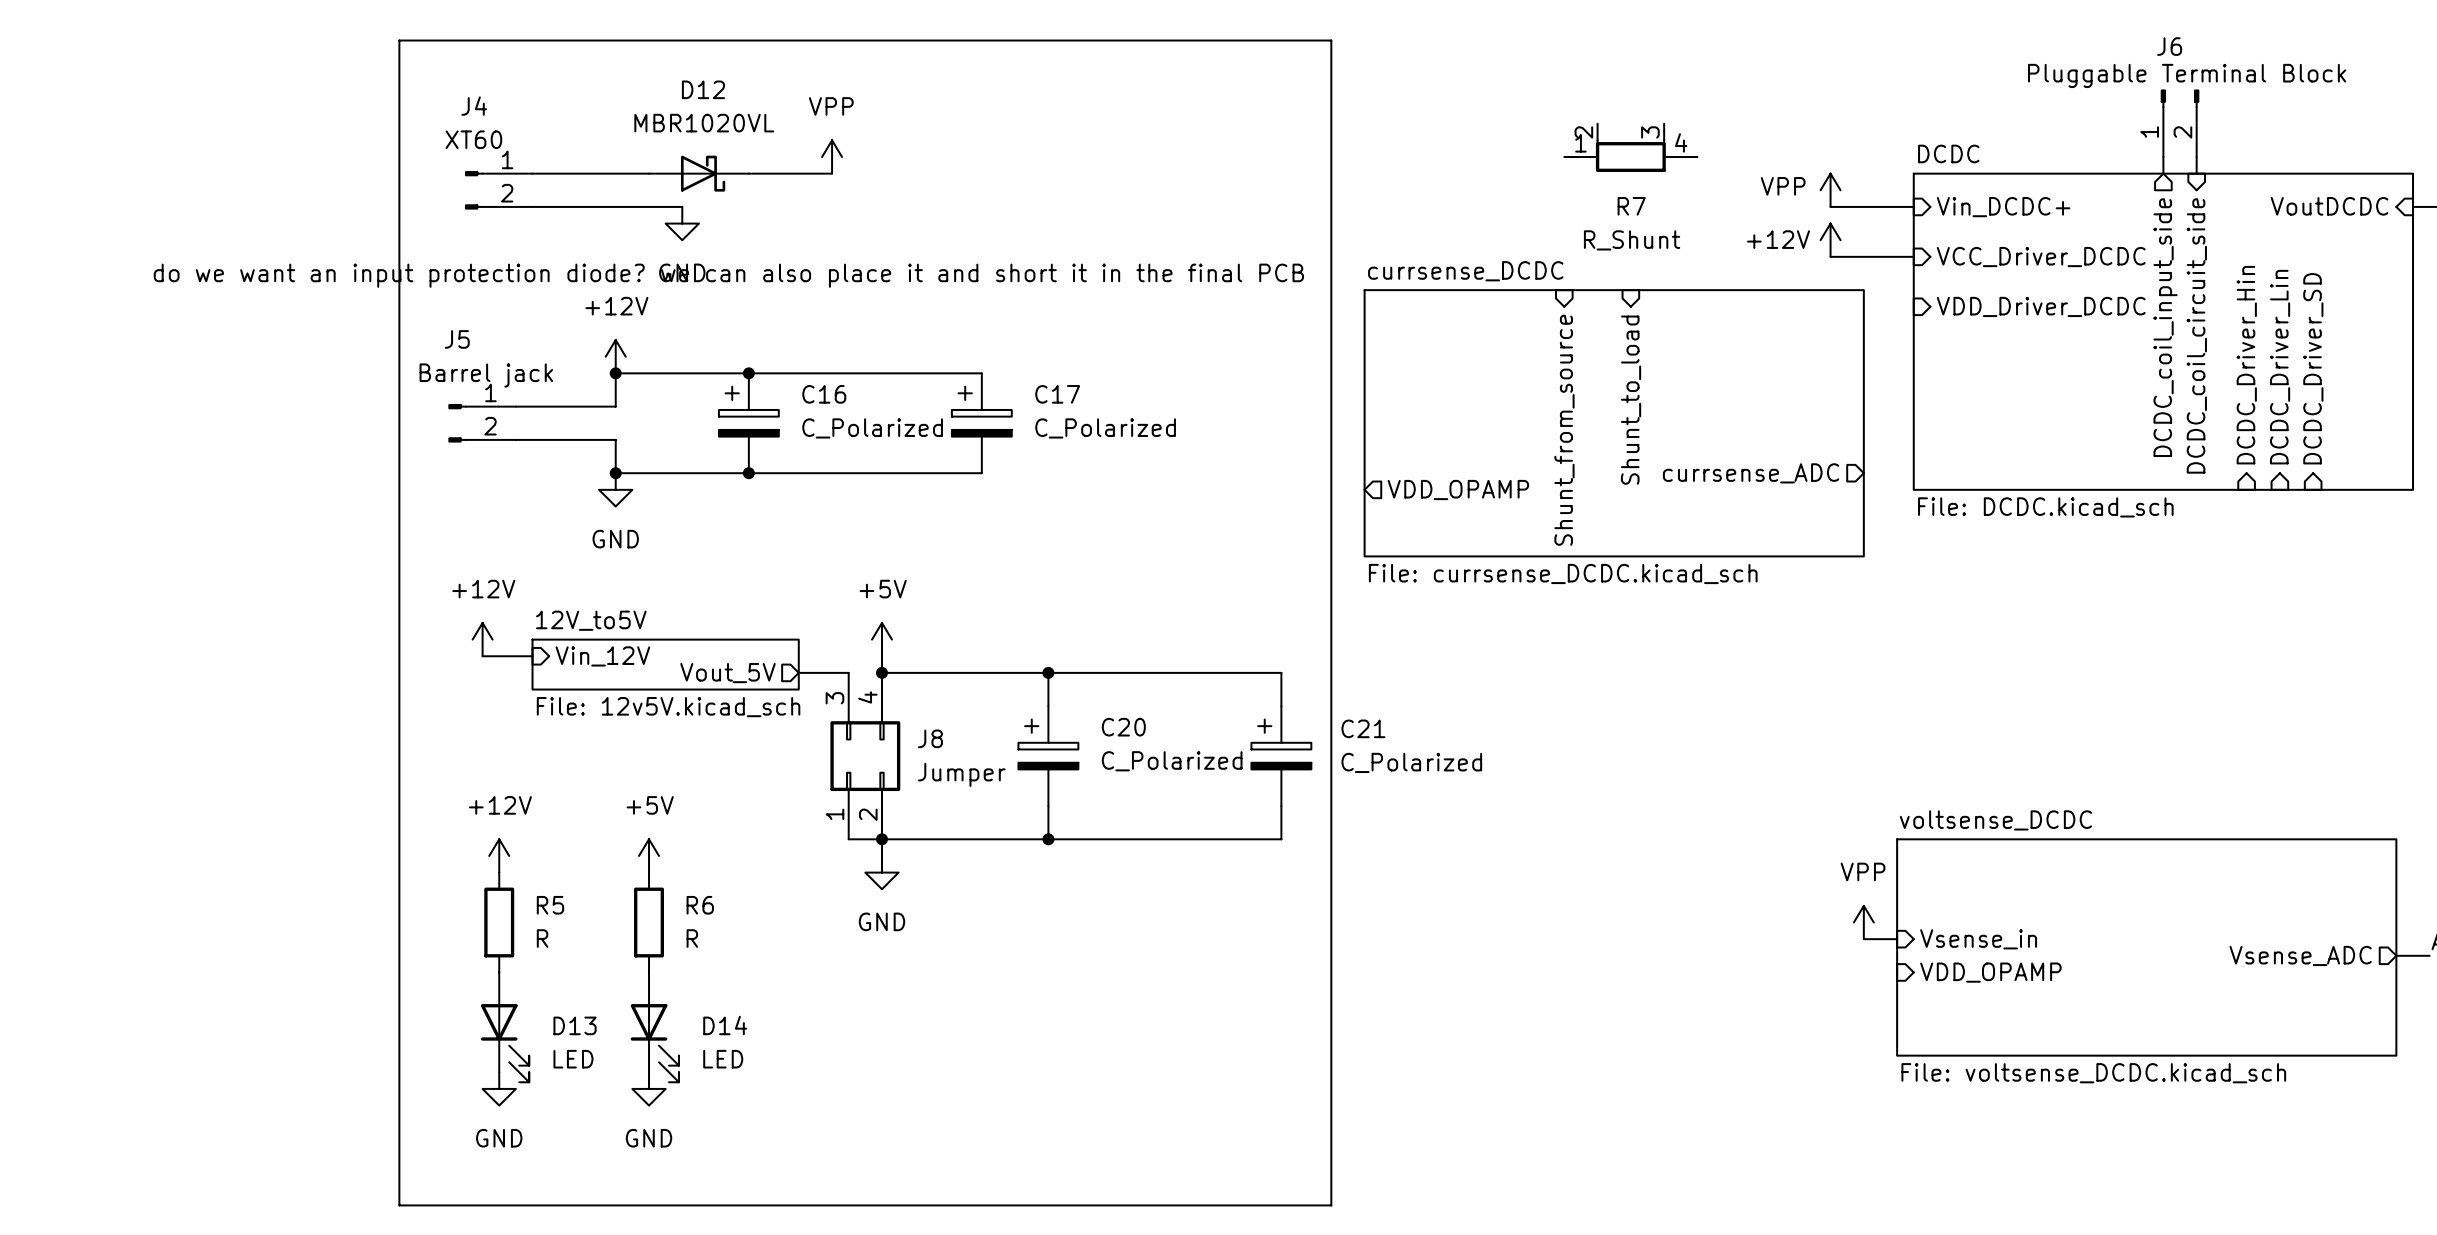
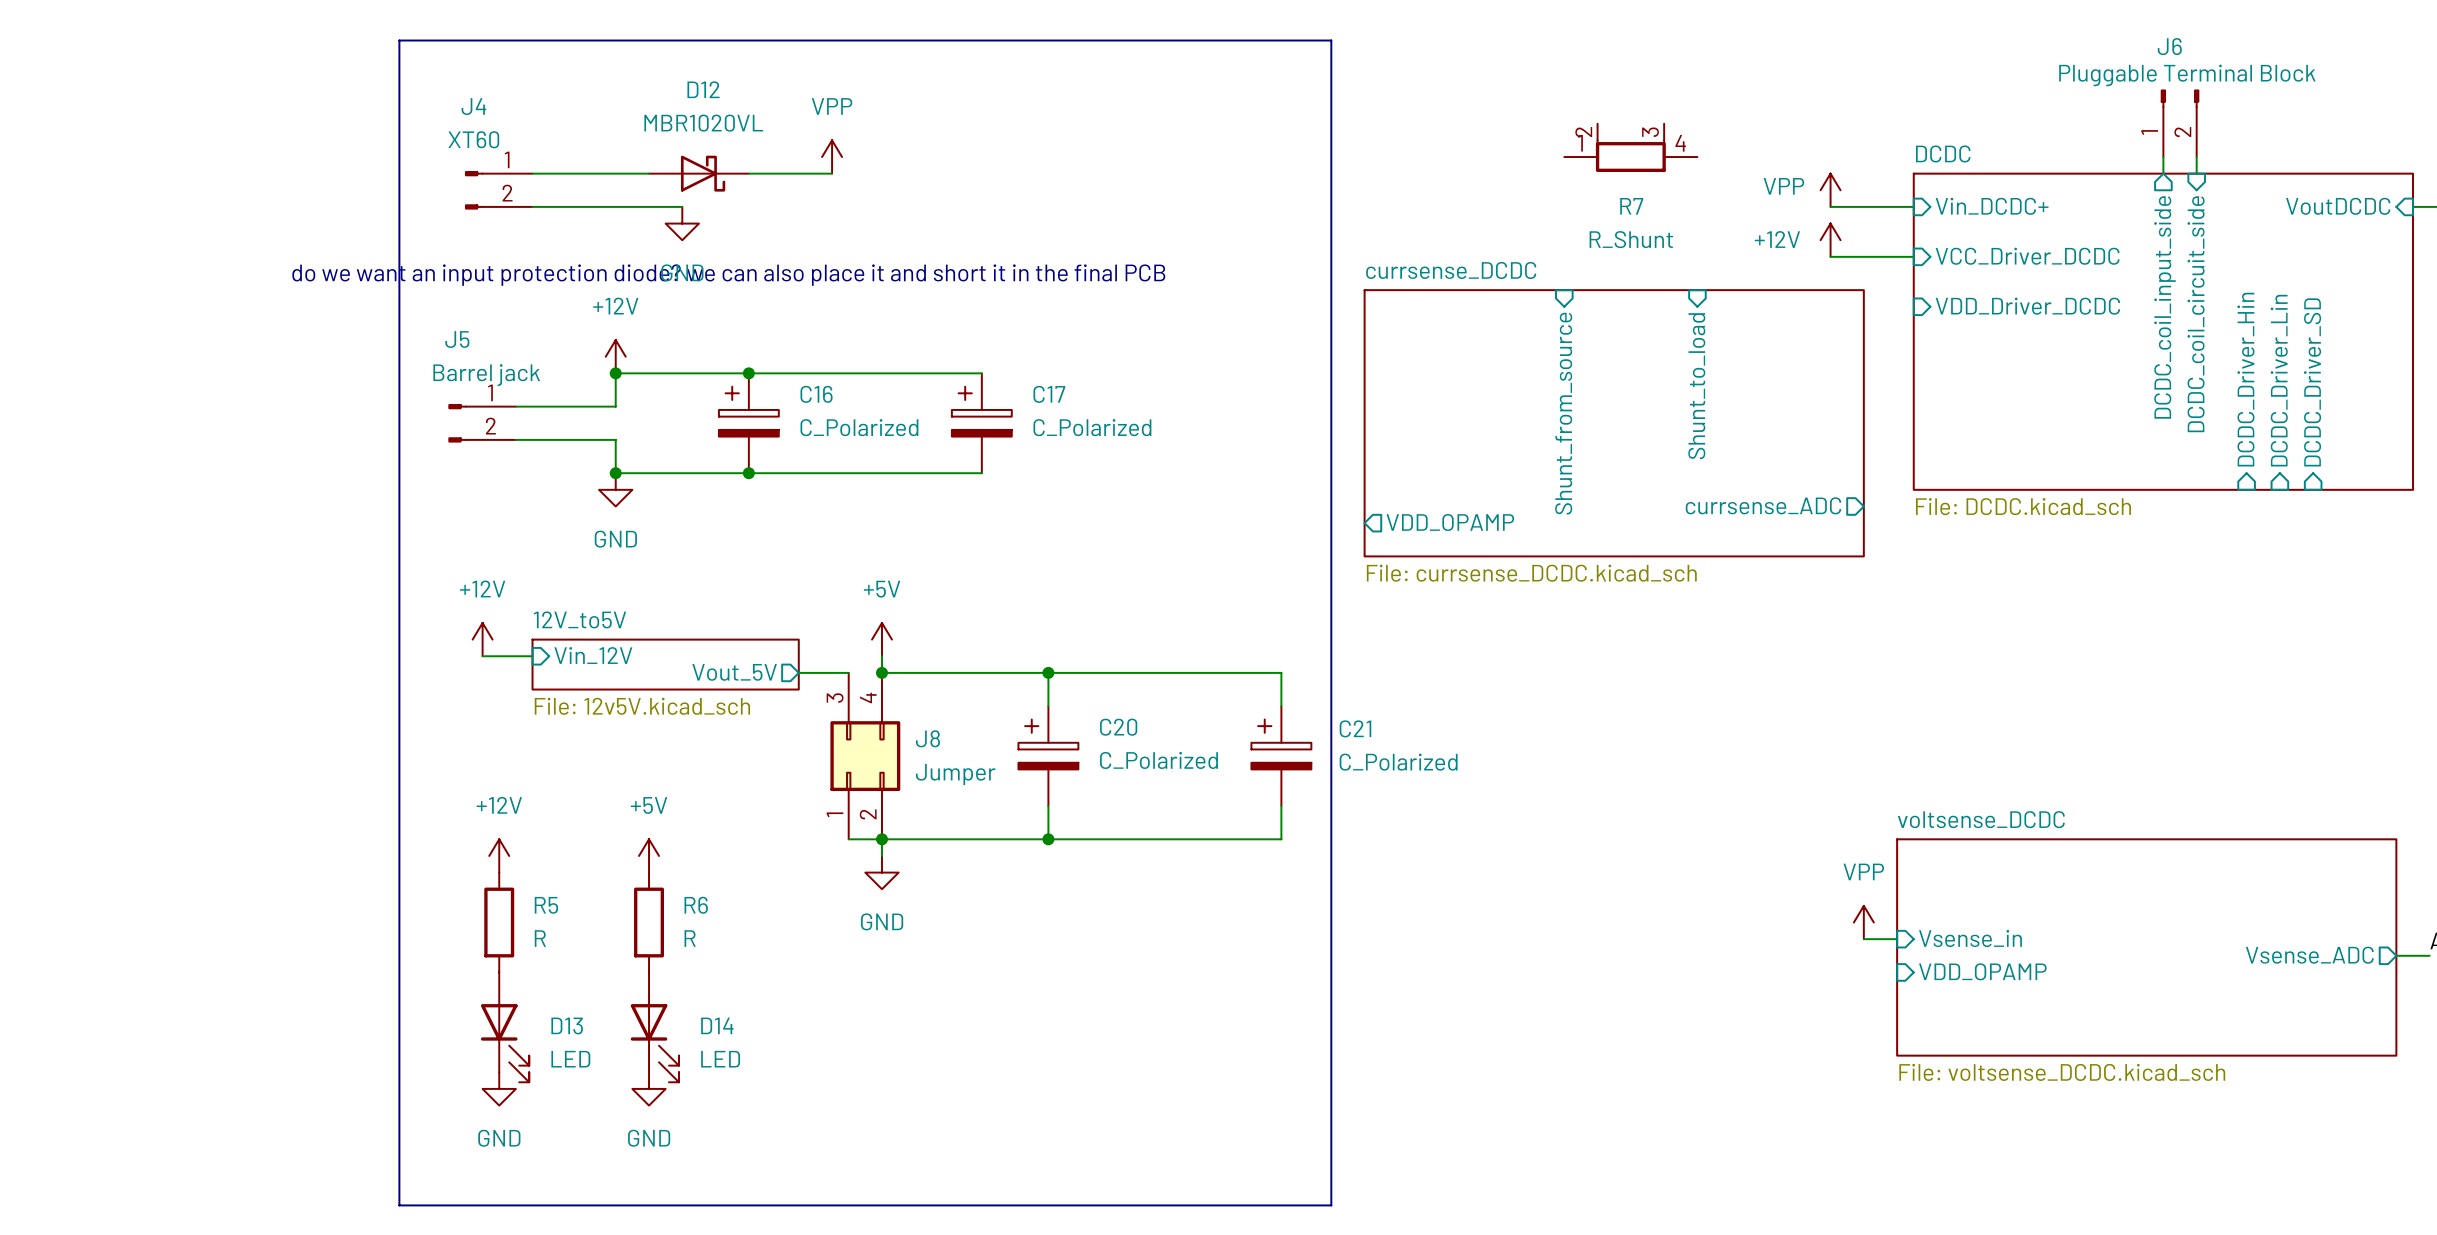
sheet pin position: Shunt_to_load (1631, 400) -> Shunt_to_load (1696, 386)
sheet pin position: currsense_ADC (1751, 473) -> currsense_ADC (1763, 505)
sheet pin position: VDD_OPAMP (1458, 490) -> VDD_OPAMP (1450, 522)

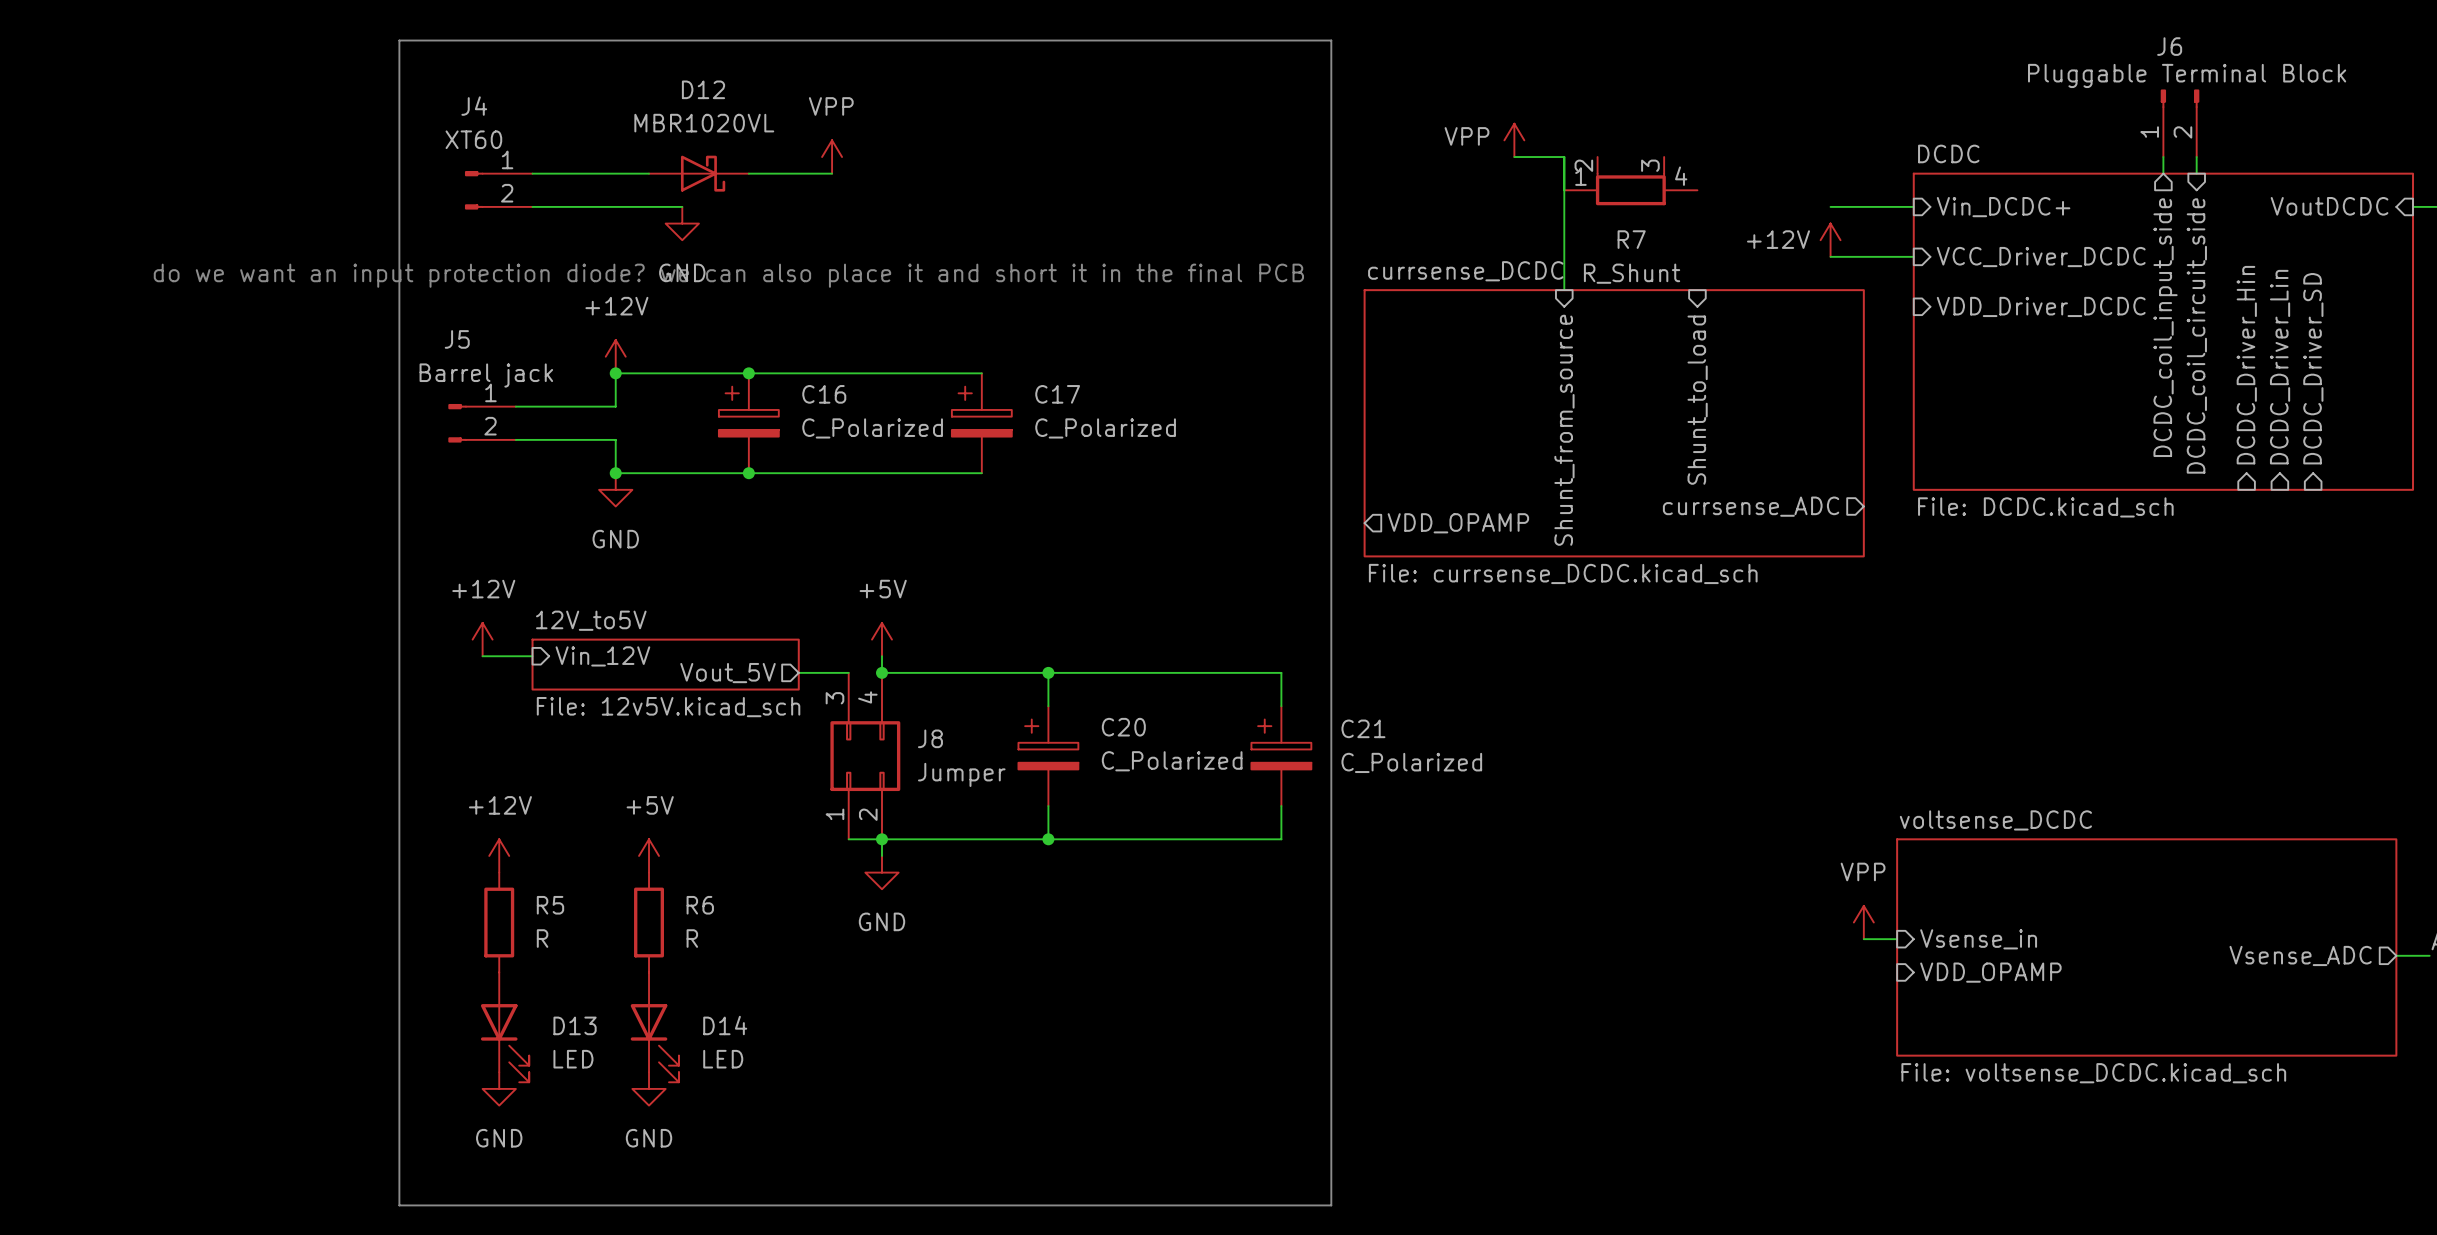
R7 position: (1630, 147) -> (1630, 181)
wire: none -> (1514, 157) (1564, 157) (1564, 290)
power symbol position: VPP (1830, 190) -> VPP (1514, 140)

